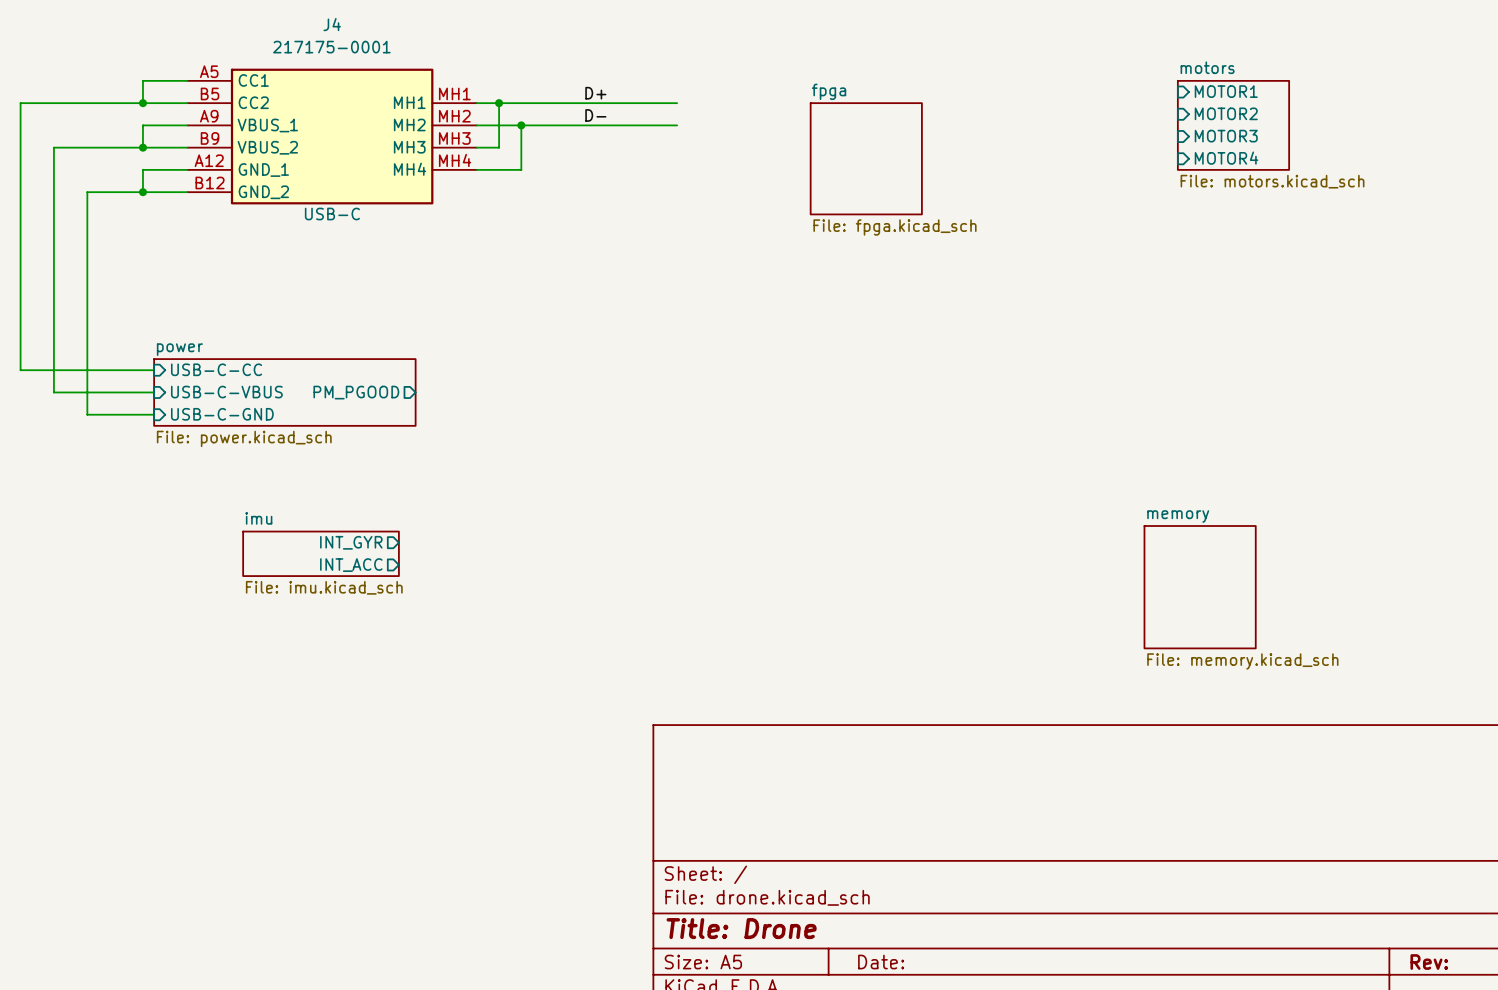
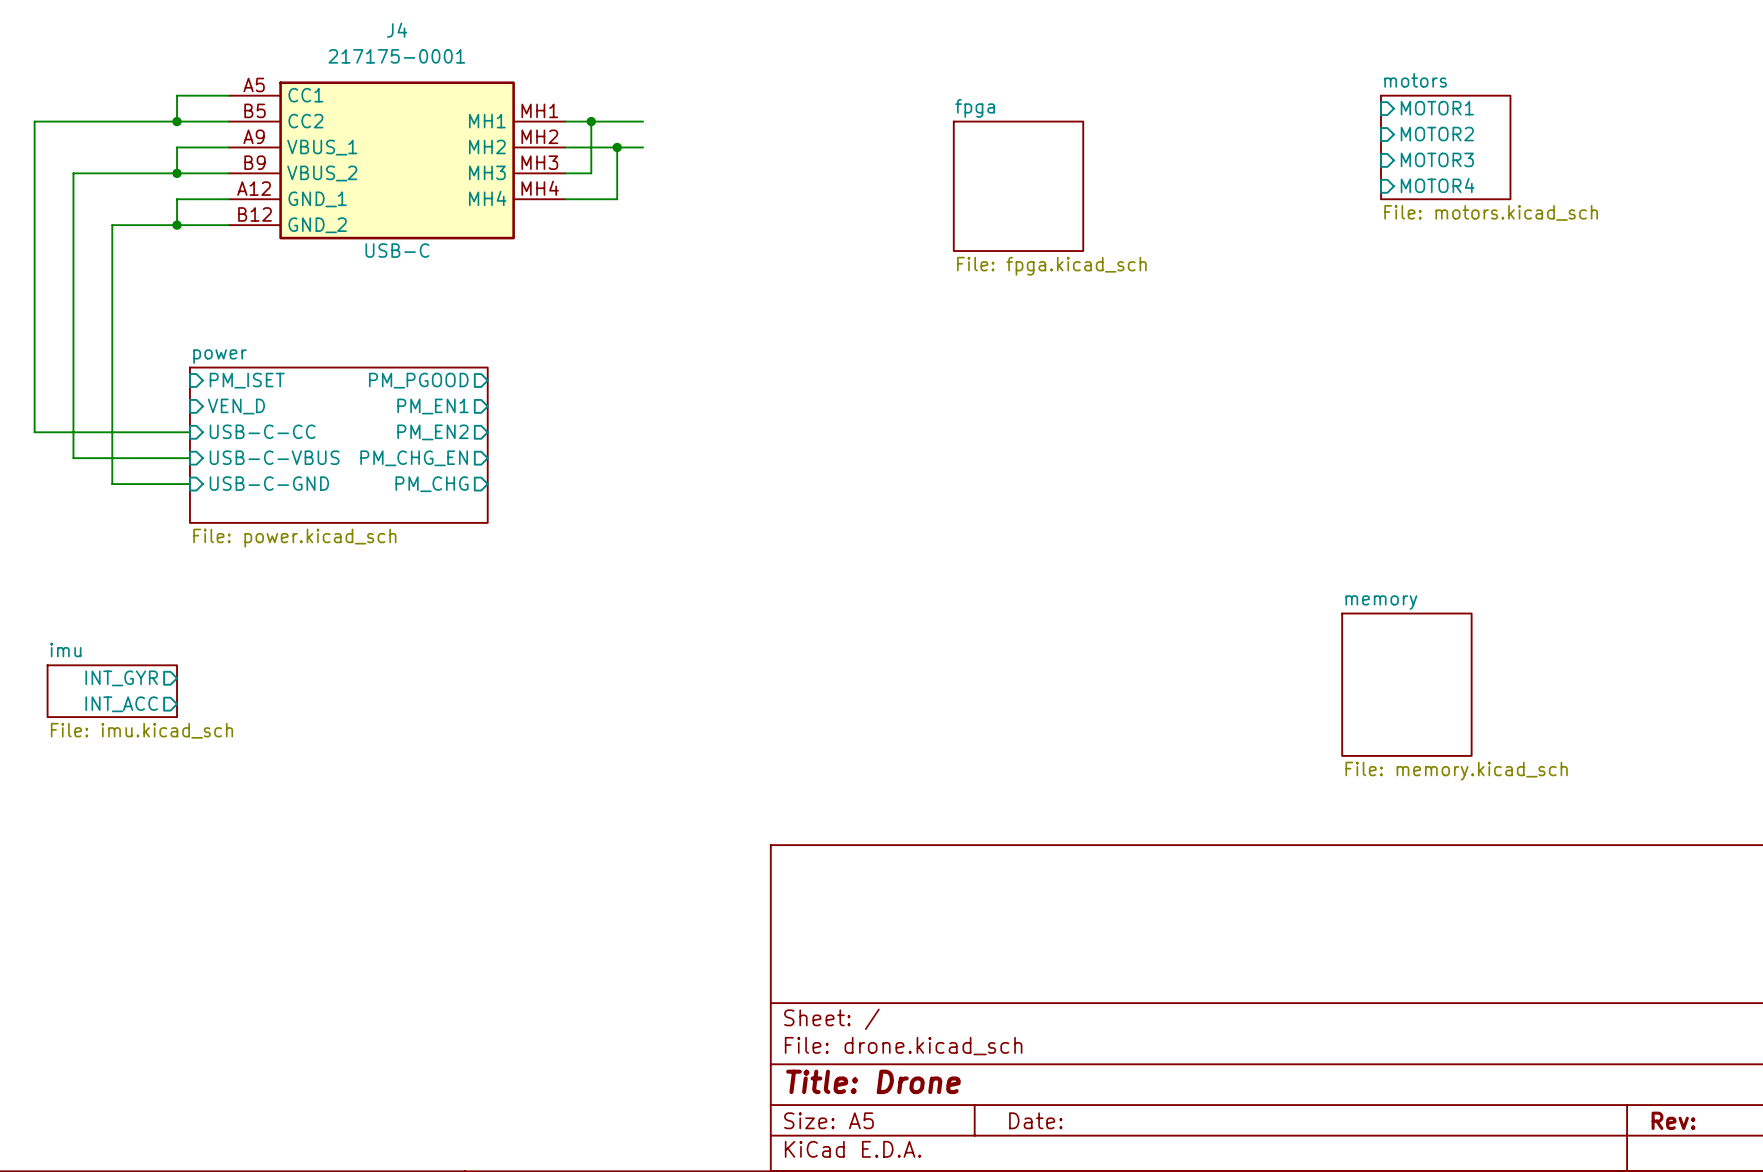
label: D+ (595, 93) -> none
wire: (543, 103) (677, 103) -> none
label: D- (595, 115) -> none
wire: (543, 125) (677, 125) -> none
sheet pin: none -> PM_ISET (247, 380)
sheet pin: none -> VEN_D (236, 406)
sheet pin: none -> PM_EN1 (432, 406)
sheet pin: none -> PM_EN2 (432, 432)
sheet power: none -> File: power.kicad_sch (338, 445)
sheet power: File: power.kicad_sch (284, 392) -> none
sheet pin: none -> PM_CHG_EN (414, 458)
sheet pin position: PM_PGOOD (356, 392) -> PM_PGOOD (418, 380)
sheet pin: none -> PM_CHG (432, 484)
sheet pin: INT_GYR (351, 542) -> none
sheet imu: File: imu.kicad_sch (321, 553) -> none
sheet pin: INT_ACC (351, 565) -> none
sheet pin: none -> INT_GYR (121, 678)
sheet imu: none -> File: imu.kicad_sch (112, 691)
sheet pin: none -> INT_ACC (121, 704)

